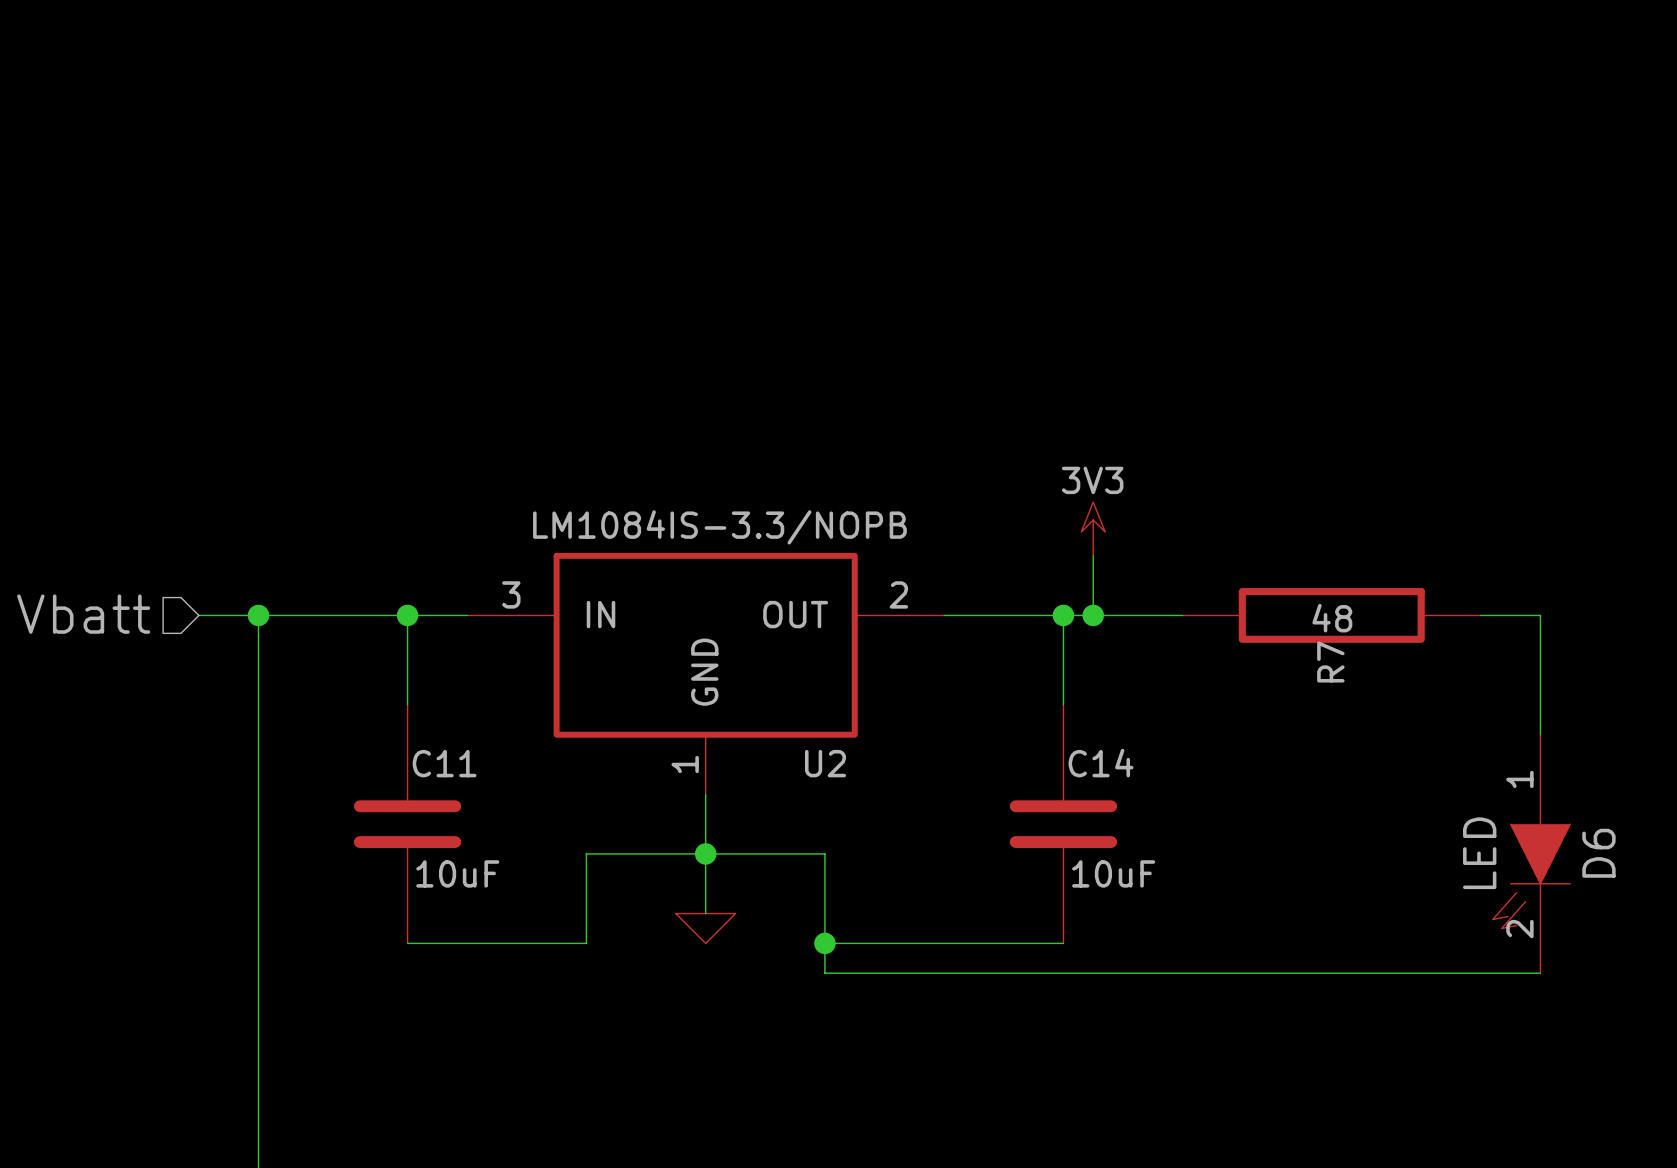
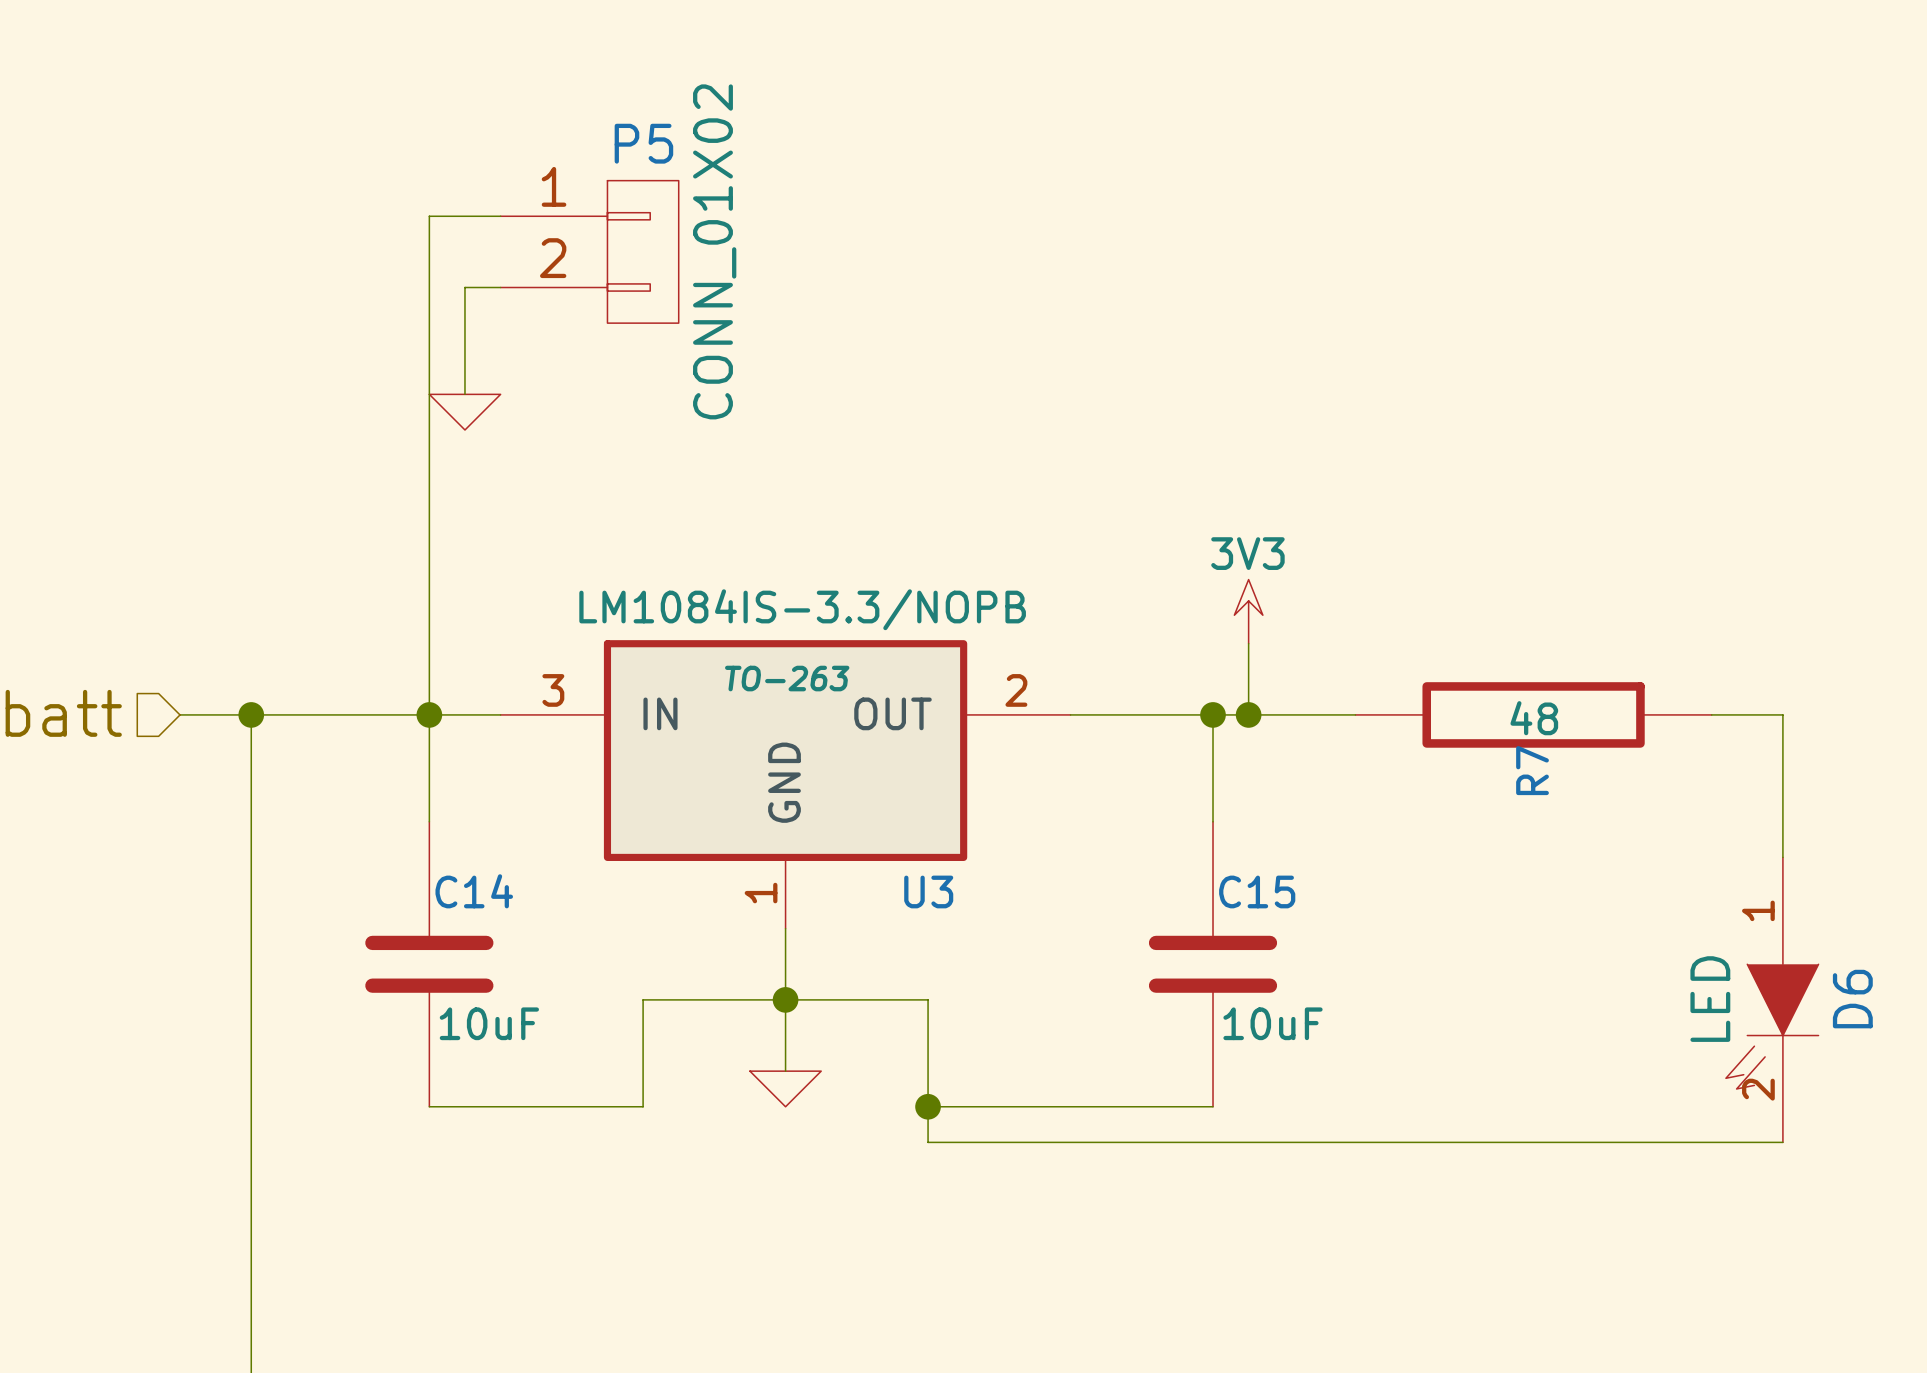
wire: none -> (500, 216) (429, 216) (429, 714)
P5: none -> CONN_01X02 (589, 251)
wire: none -> (500, 287) (464, 287) (464, 394)
power symbol: none -> (464, 412)
U2 text: none -> TO-263 (787, 678)
C11 name: C11 (444, 763) -> C14 (474, 891)
U2 name: U2 (825, 763) -> U3 (928, 891)
C14 name: C14 (1101, 763) -> C15 (1257, 891)

